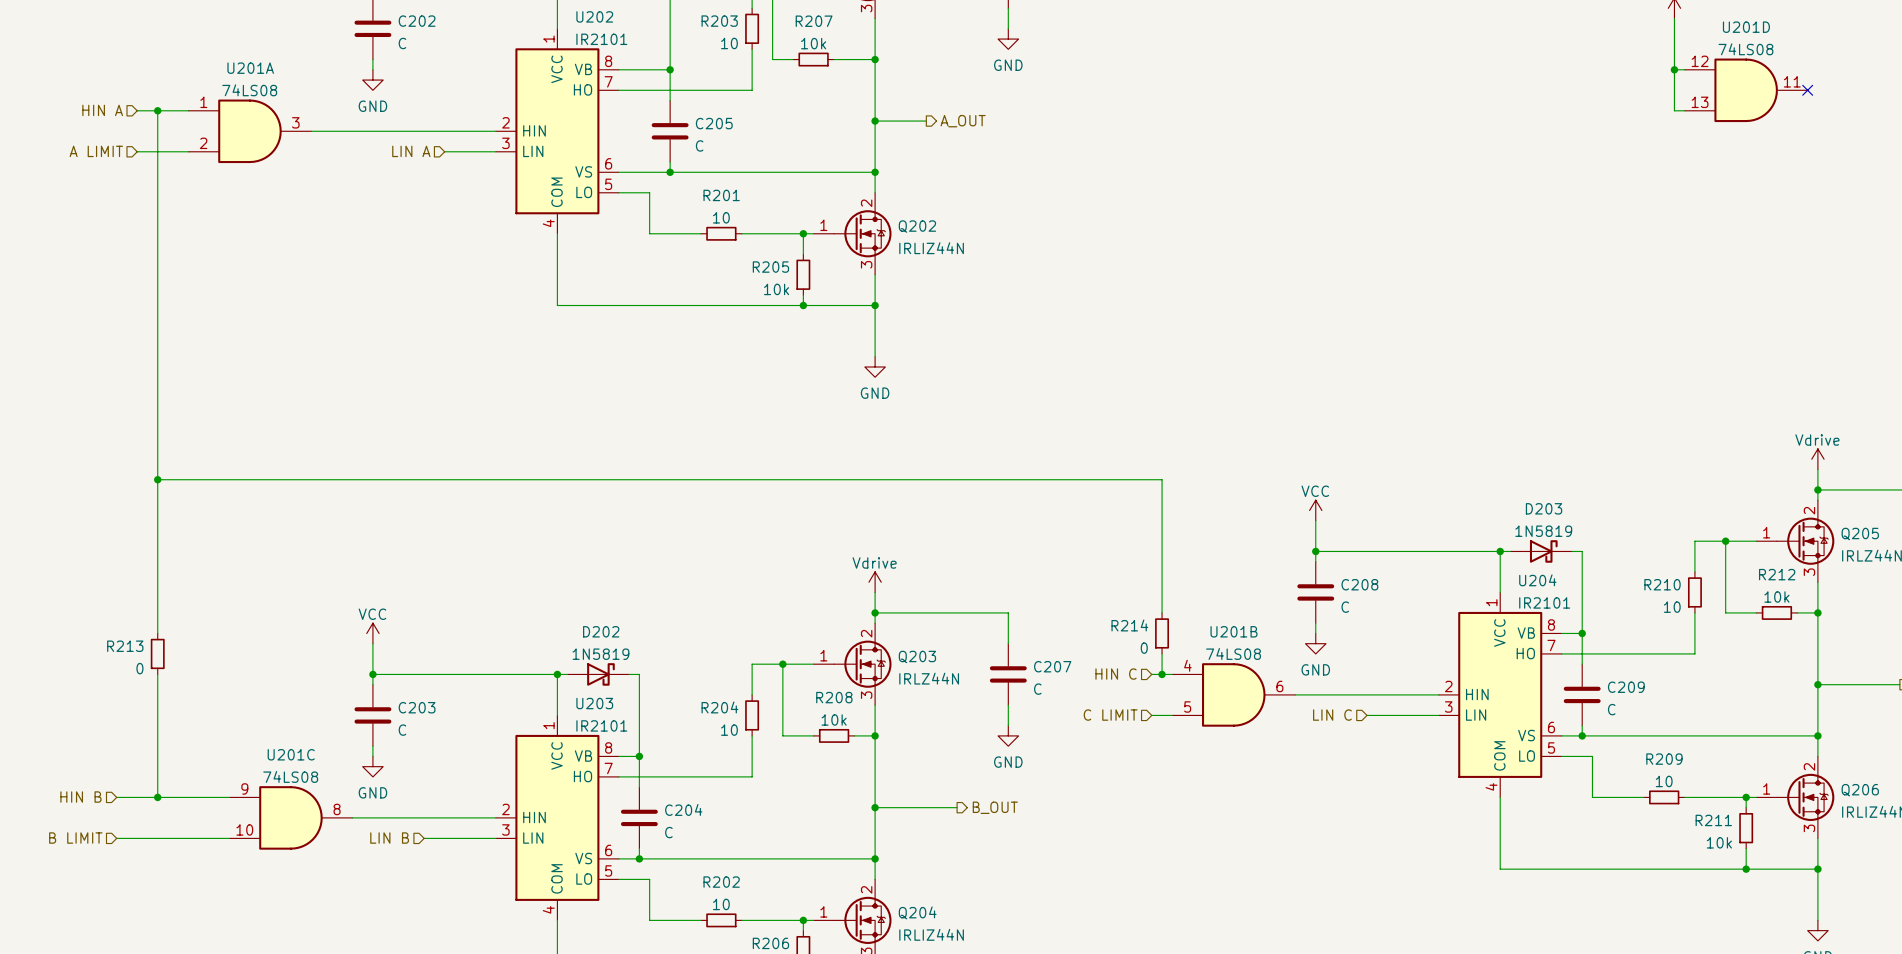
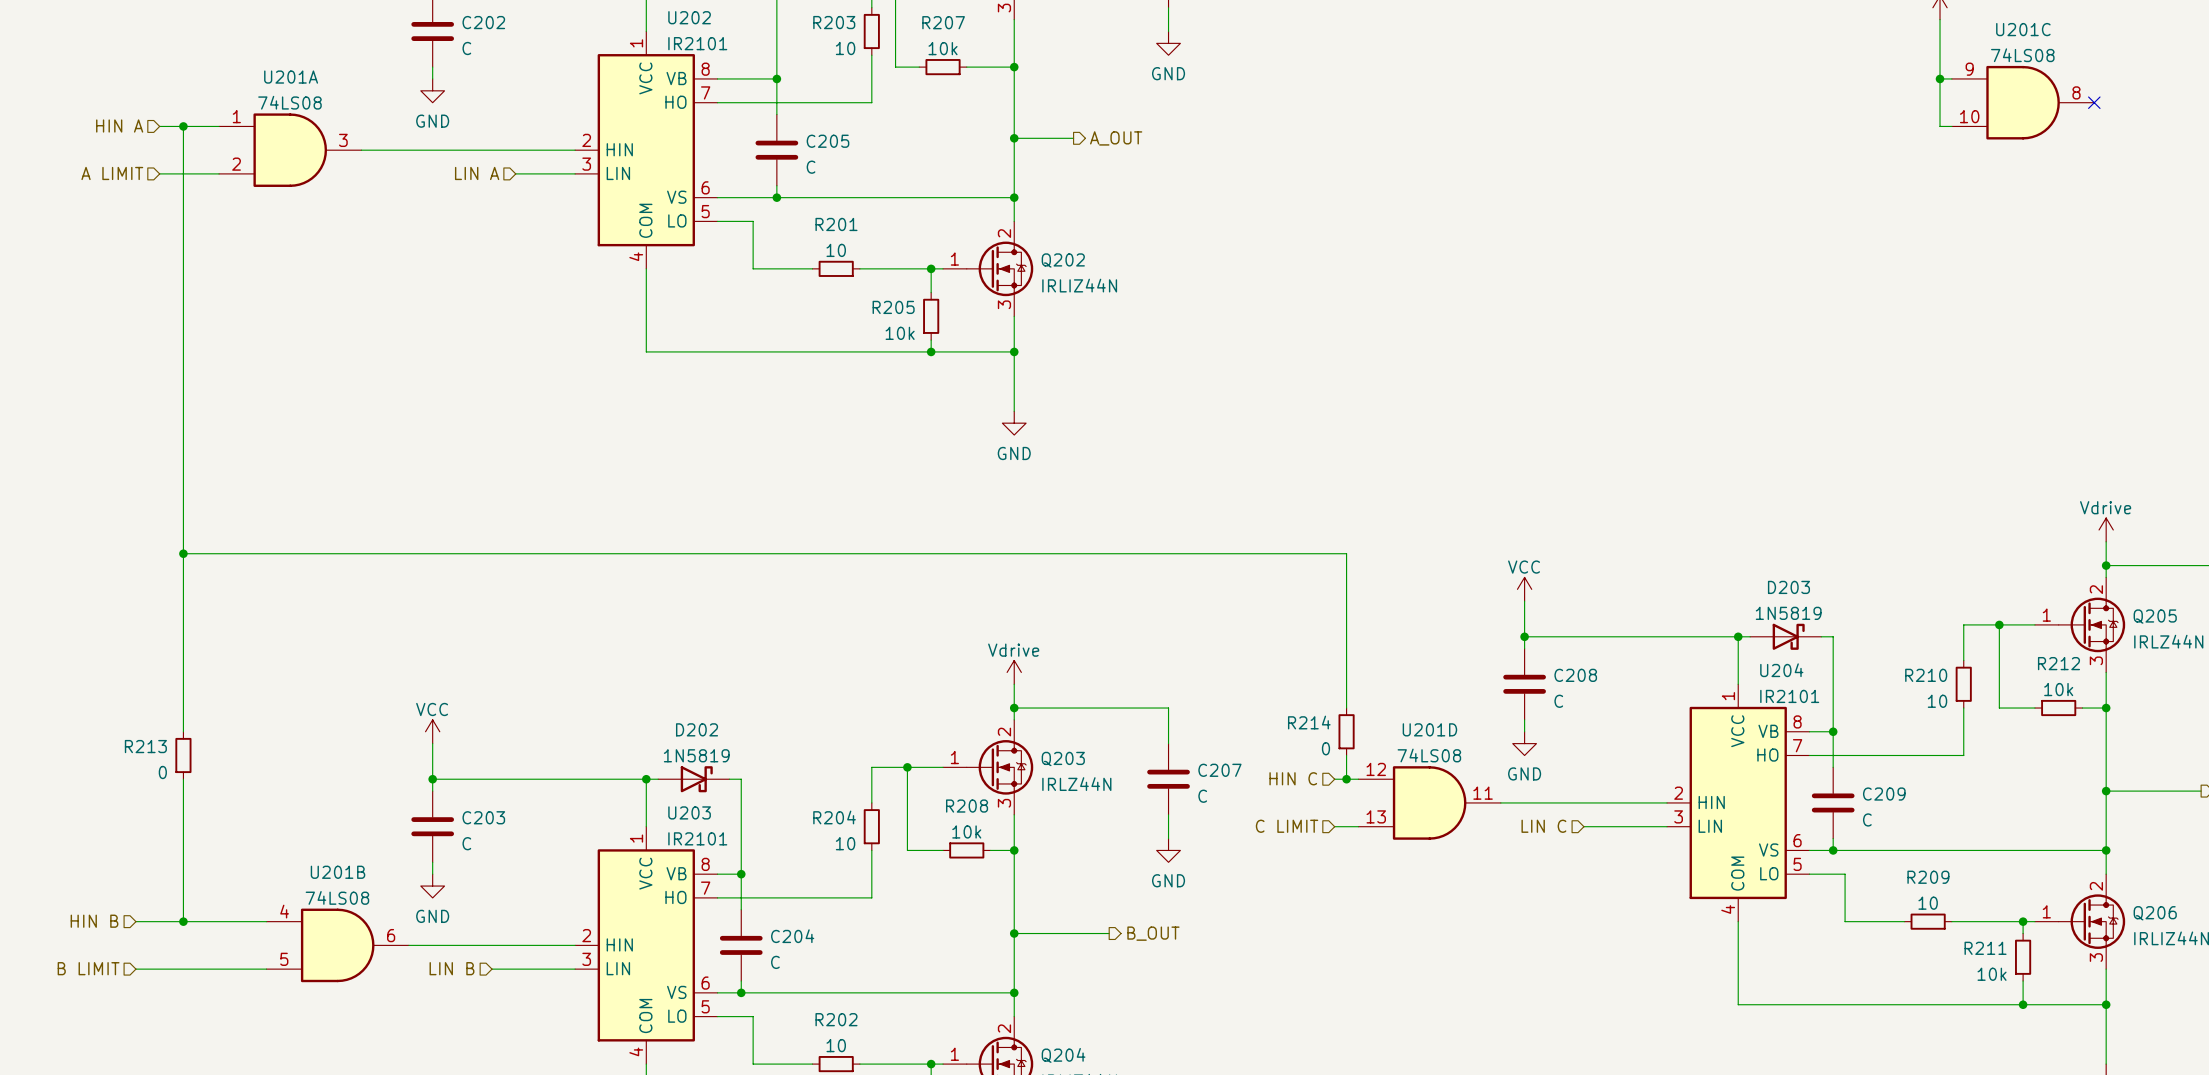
U201D position: (1746, 90) -> (1429, 802)
U201B position: (1233, 694) -> (337, 945)
U201C position: (290, 817) -> (2023, 102)

